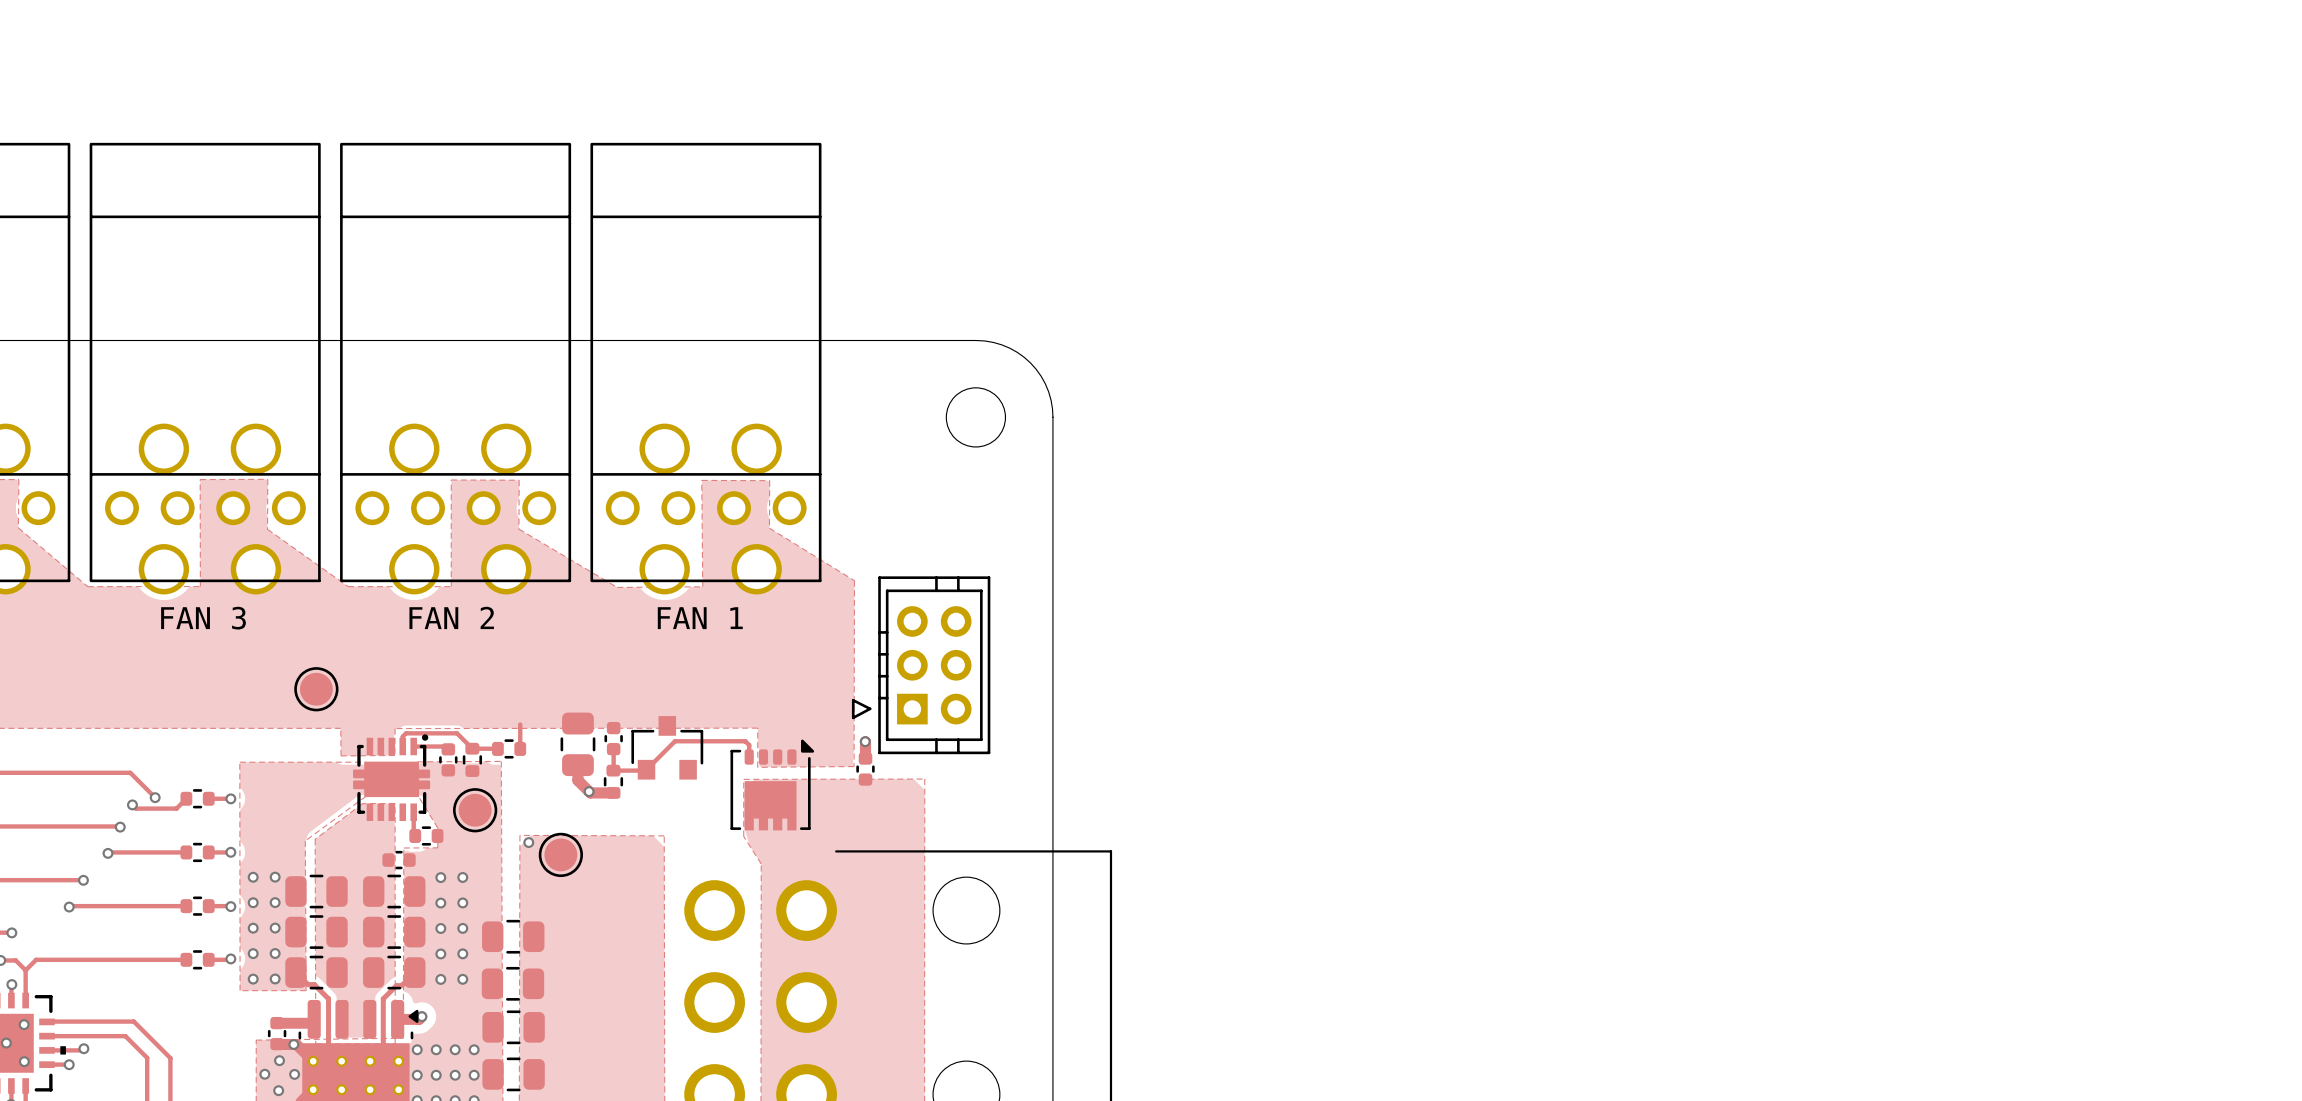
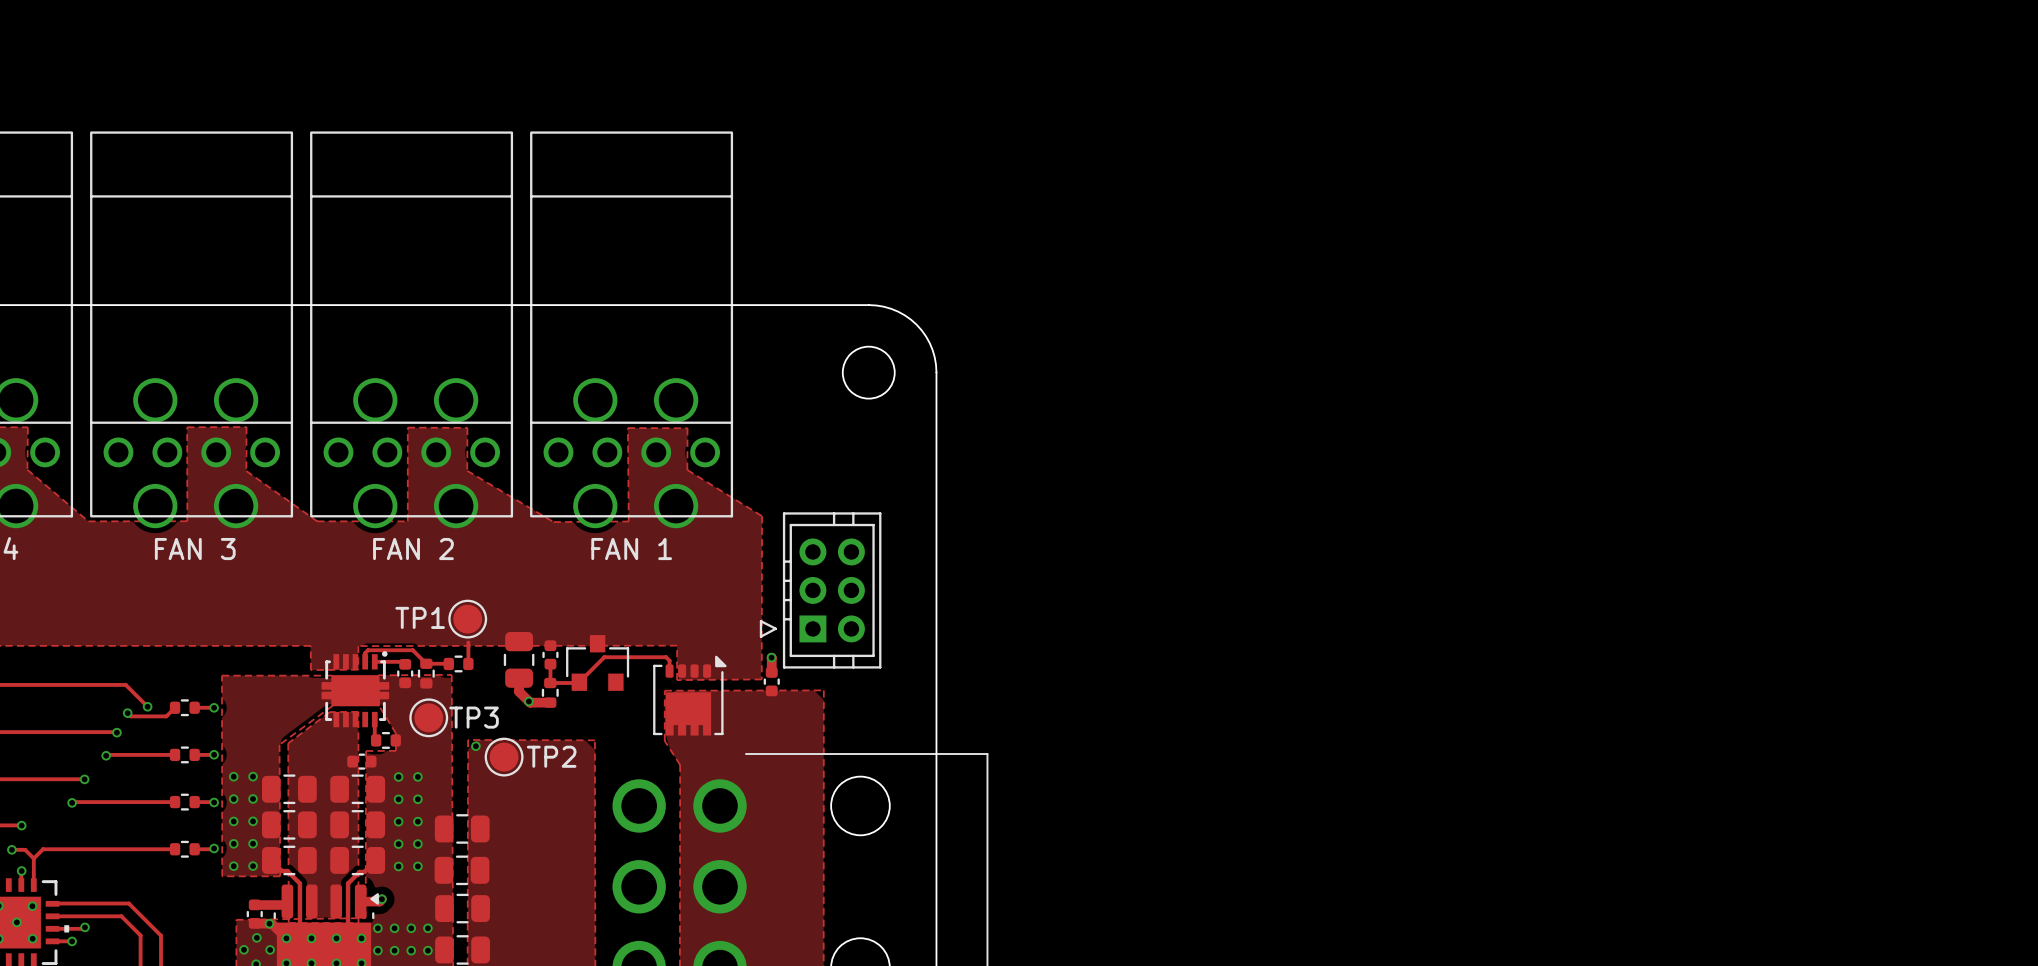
part: (316, 689) -> none
TP1: none -> (467, 619)
TP3 name: none -> TP3 (474, 717)
TP2 name: none -> TP2 (551, 756)

